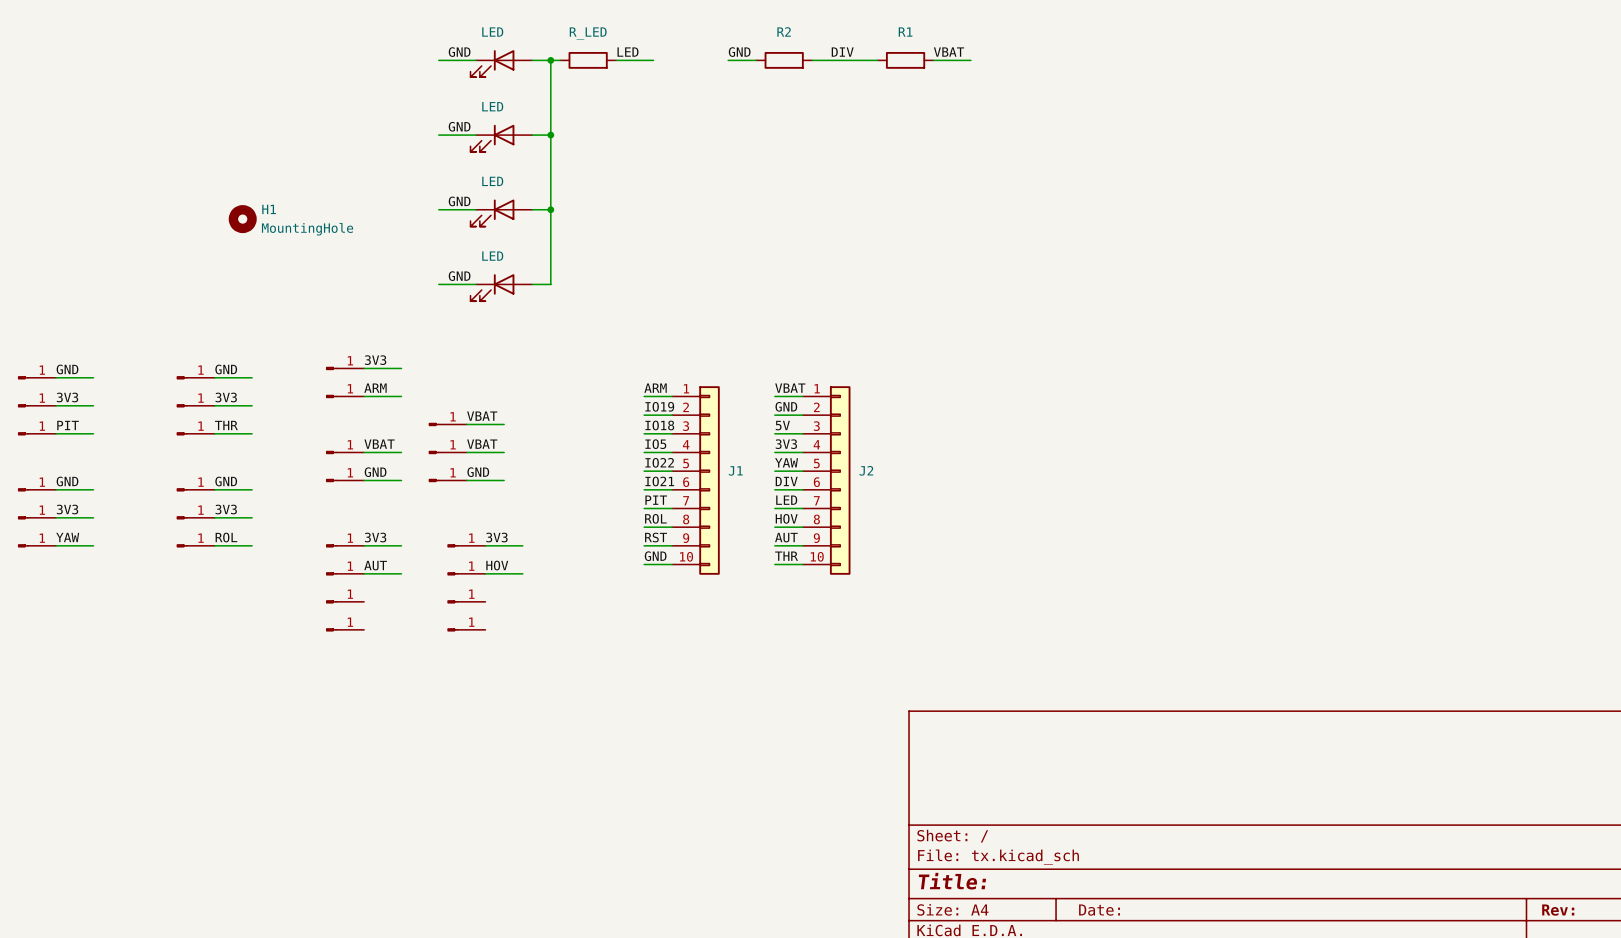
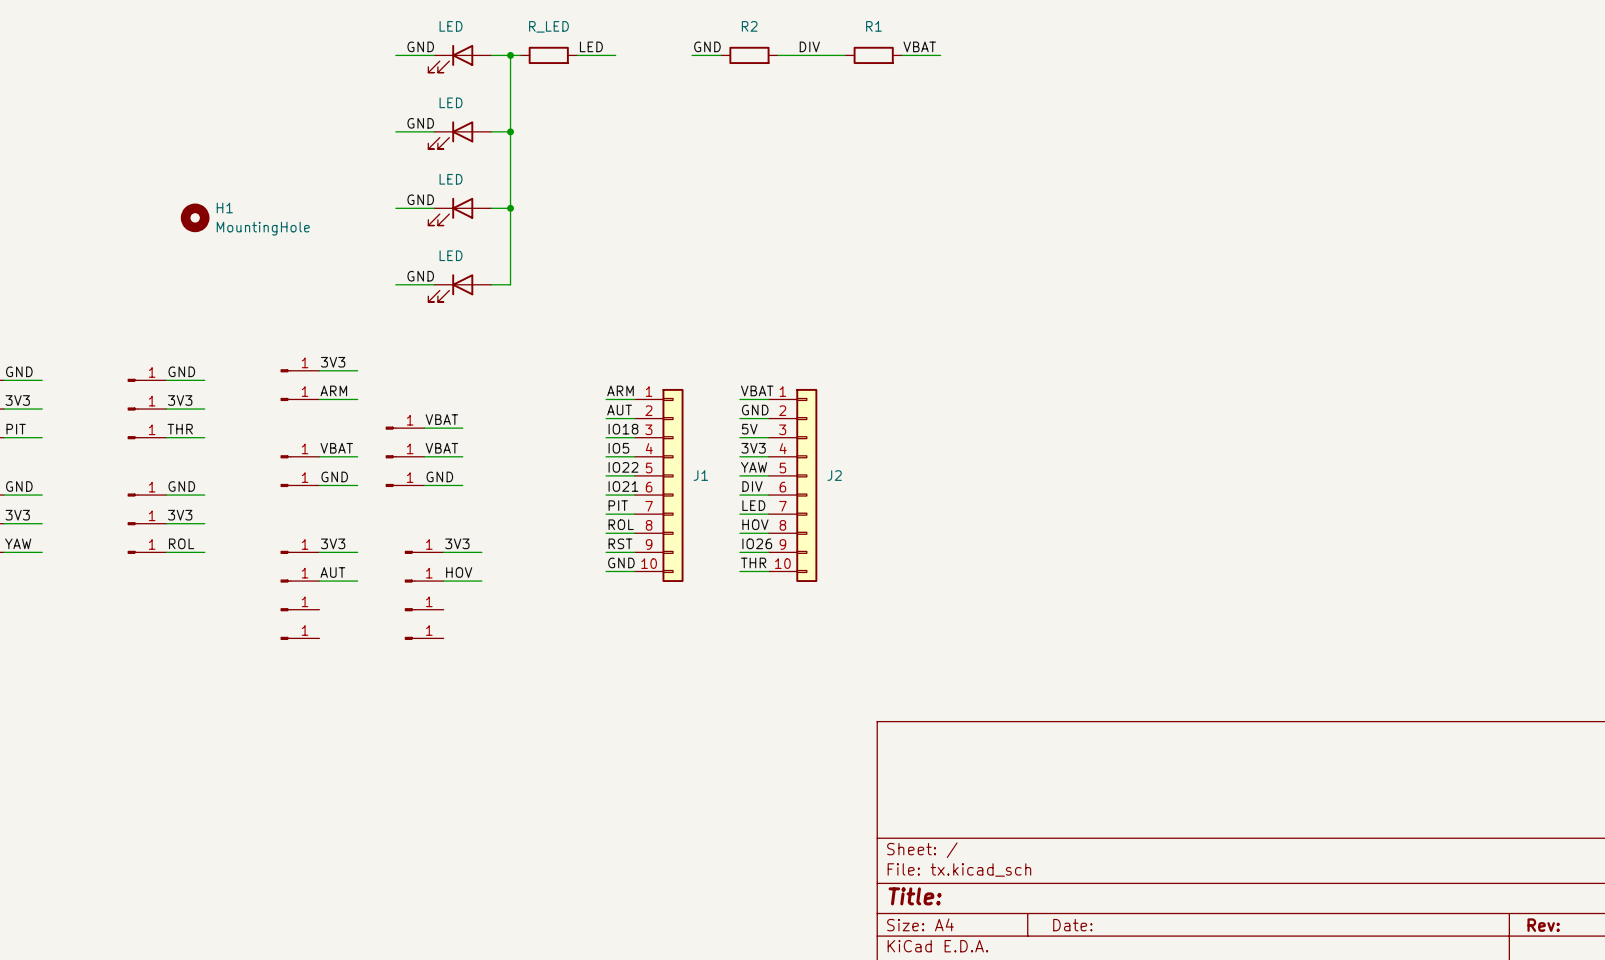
label: IO19 (659, 406) -> AUT (619, 410)
label: AUT (786, 537) -> IO26 (757, 543)

